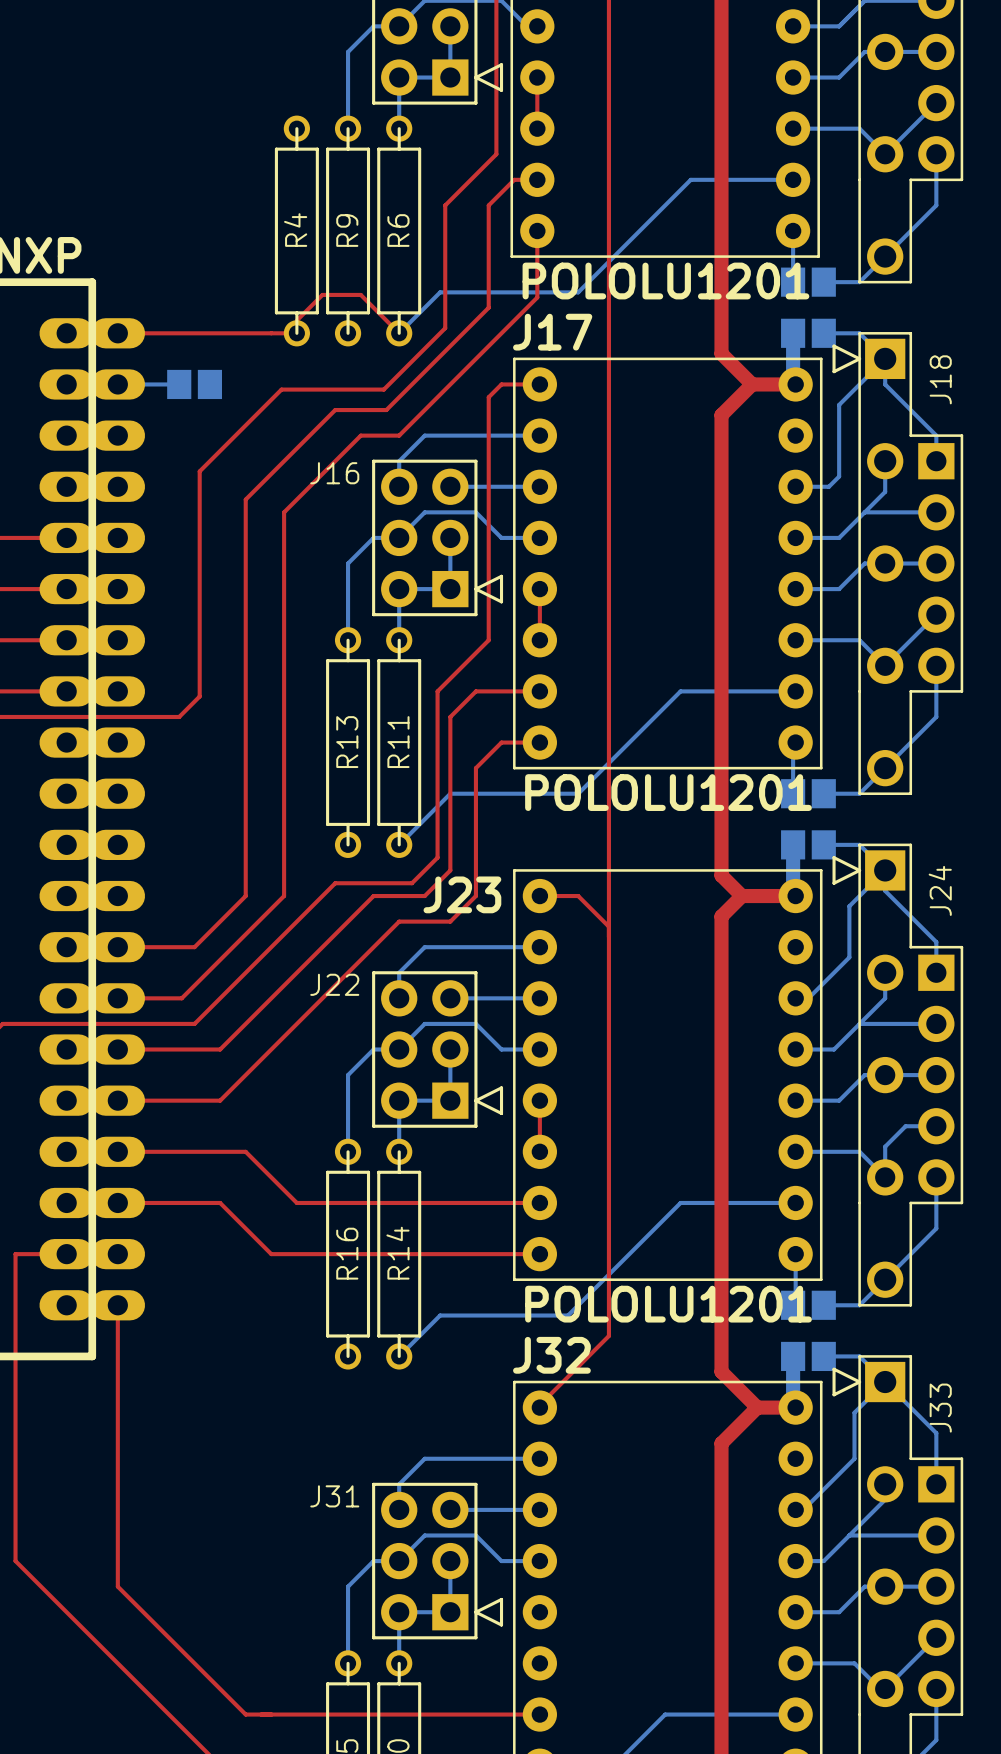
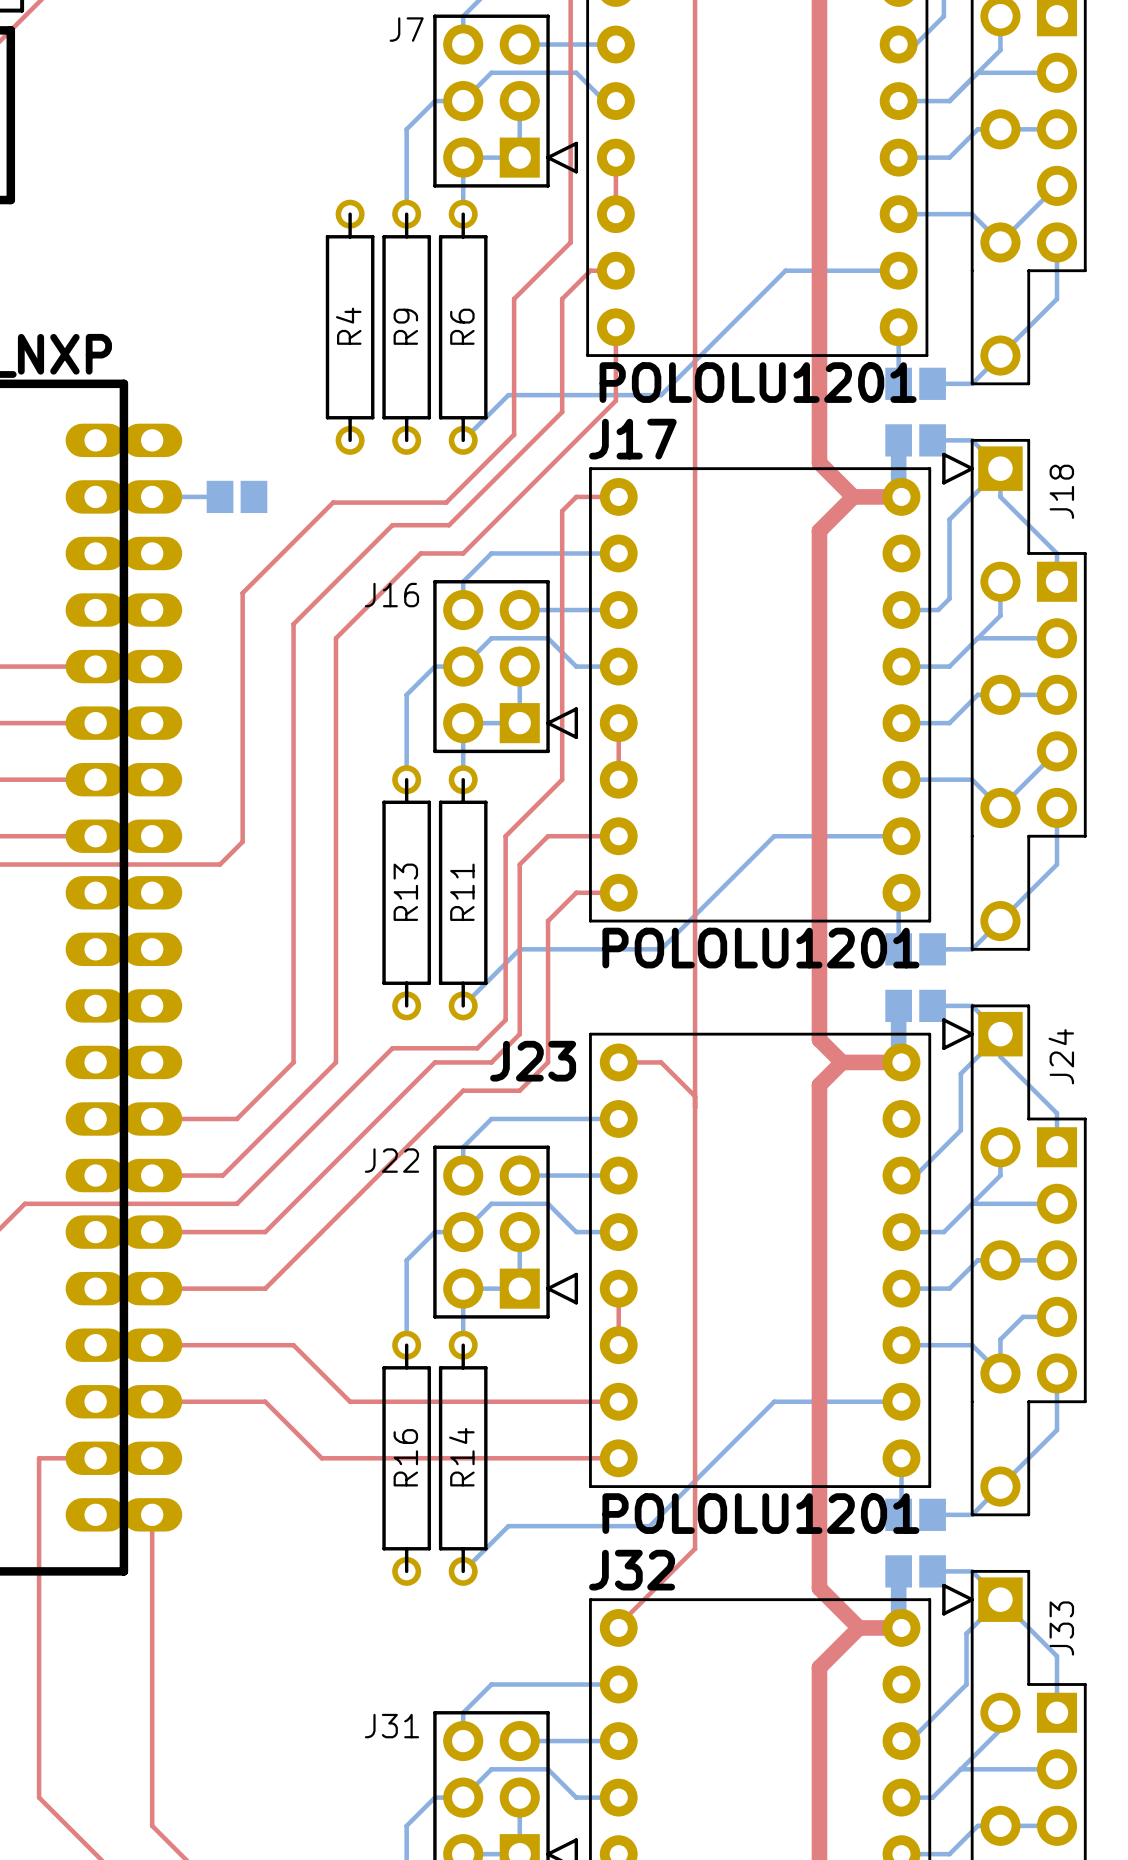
top track: (66, 333) (296, 333) (296, 320) (322, 294) (360, 294) (399, 333) -> none

